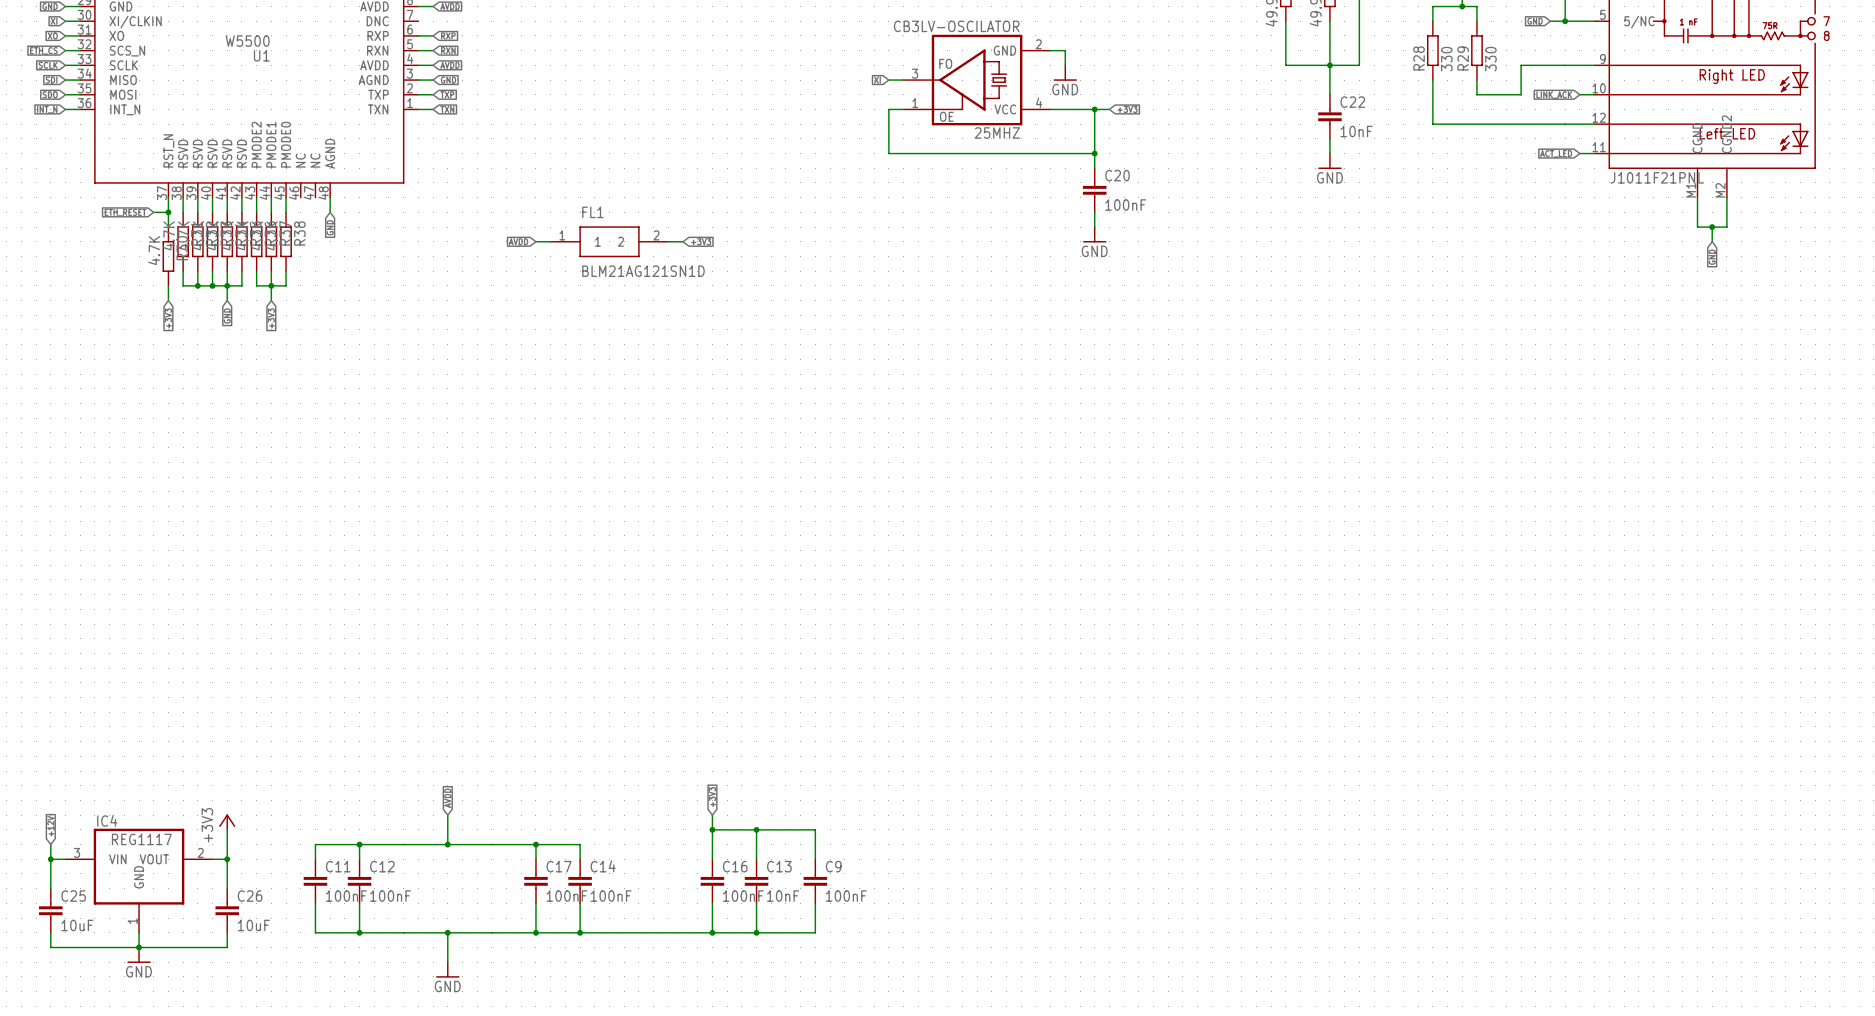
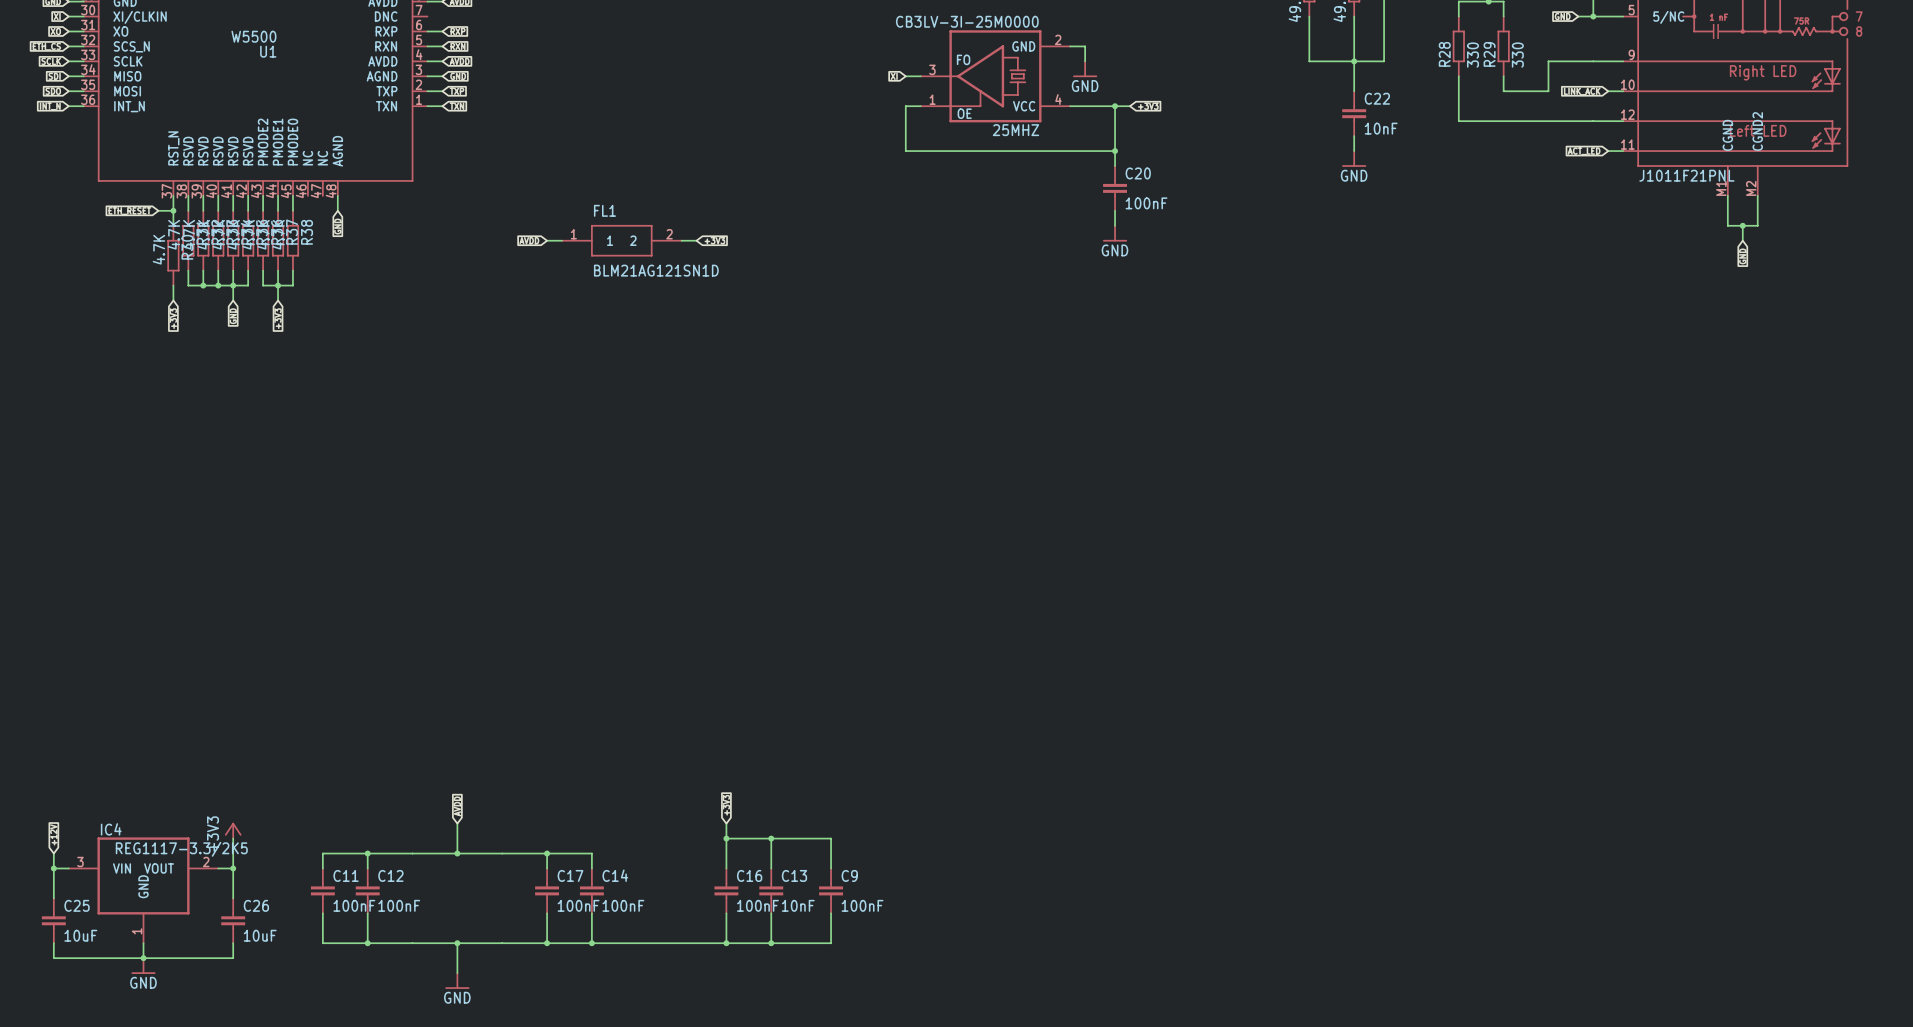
25MHZ value: CB3LV-OSCILATOR (956, 26) -> CB3LV-3I-25M0000 (967, 21)
IC4 value: REG1117 (141, 839) -> REG1117-3.3/2K5 (181, 849)

